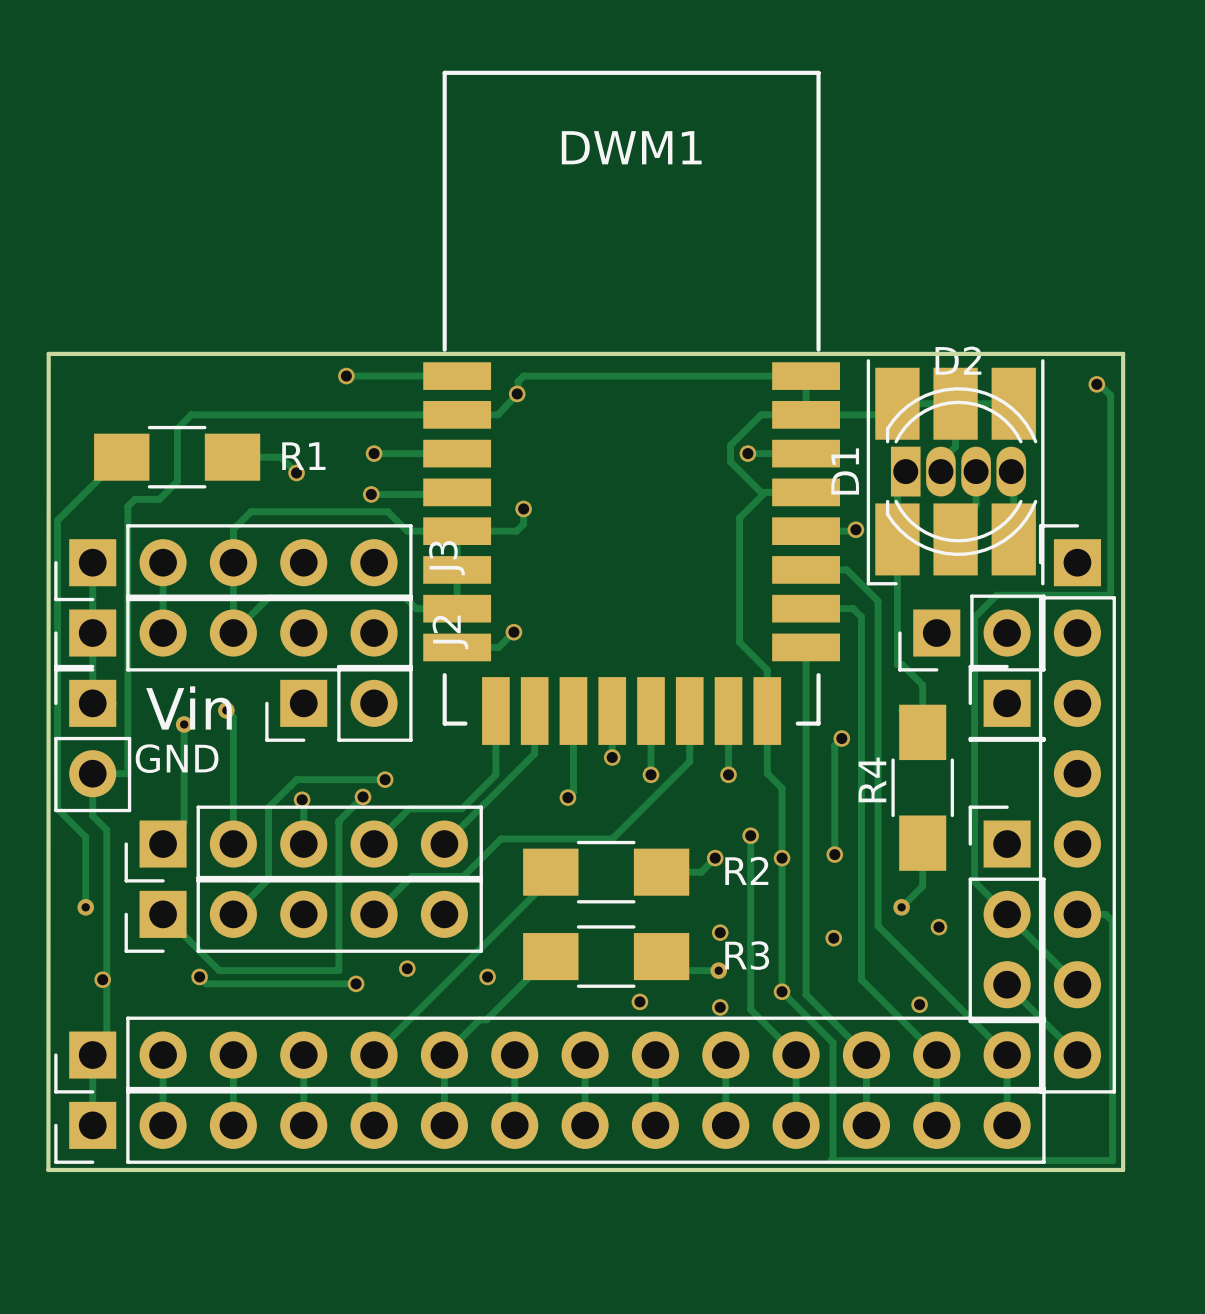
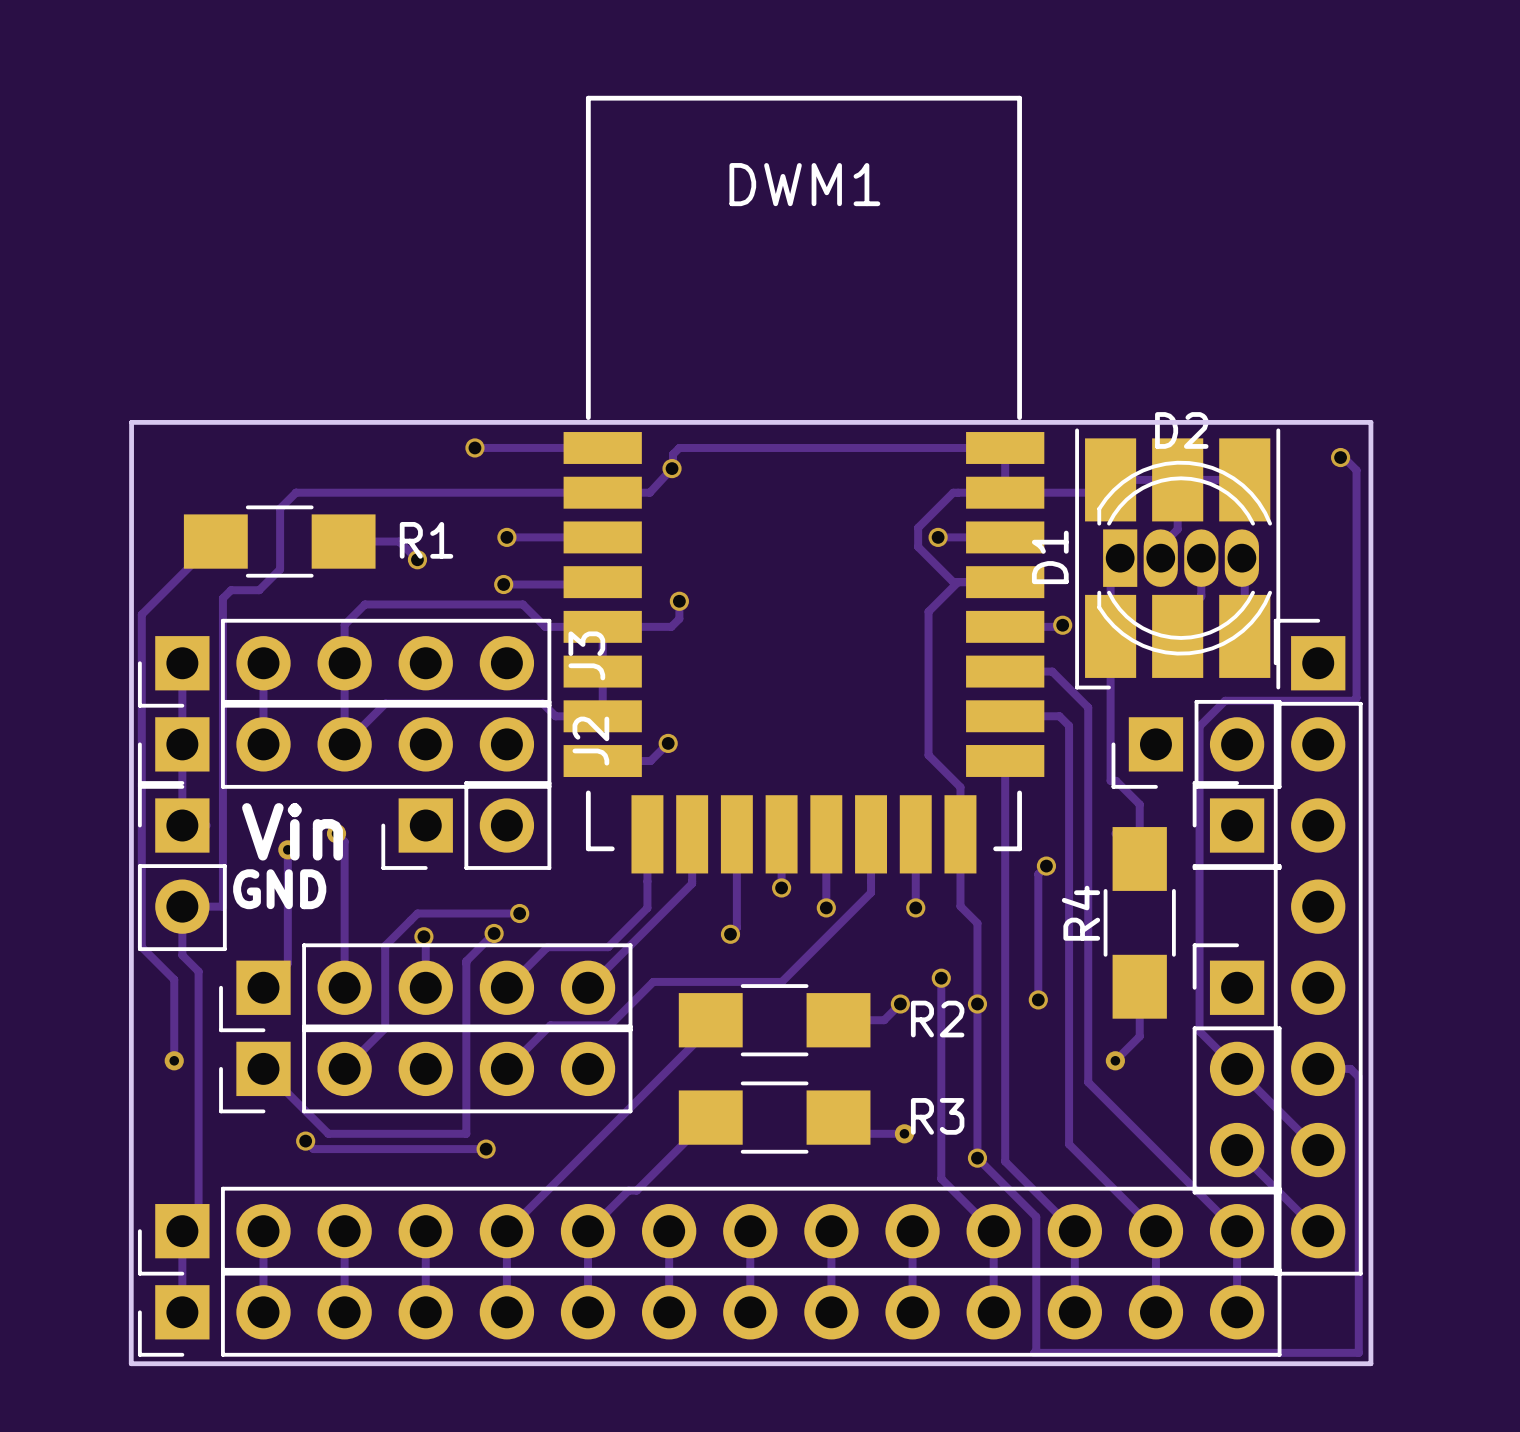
via: (938, 927) -> none
via: (720, 932) -> none
via: (833, 938) -> none
via: (407, 968) -> none
via: (487, 976) -> none
via: (102, 979) -> none
via: (639, 1001) -> none
via: (919, 1004) -> none
via: (720, 1007) -> none

